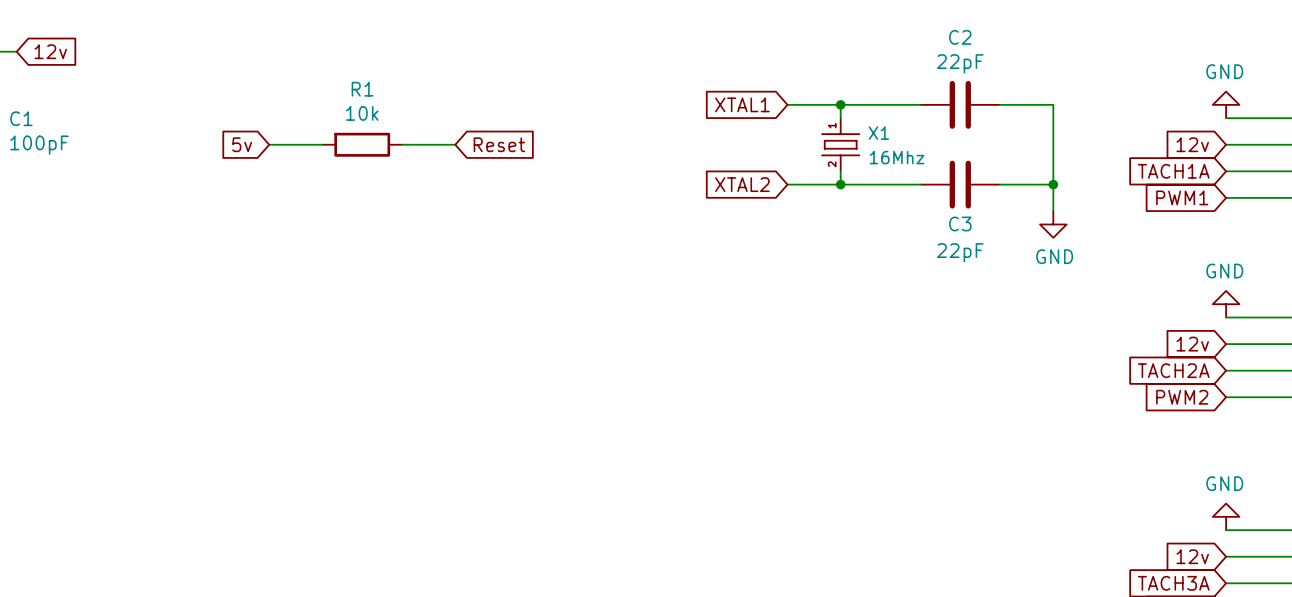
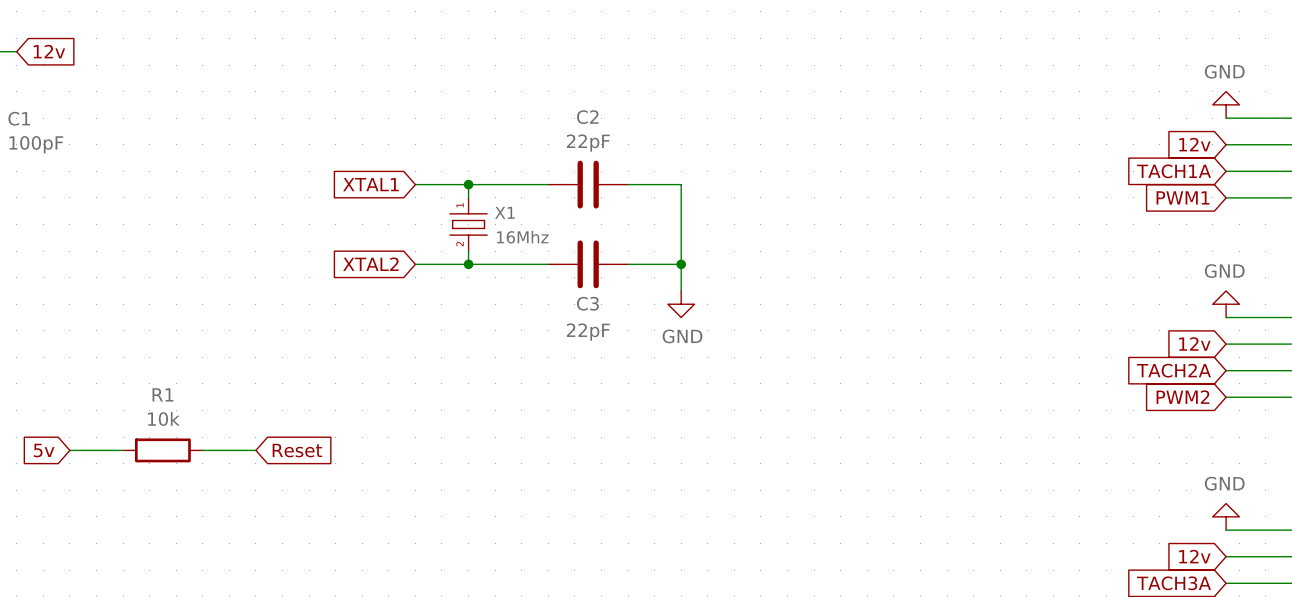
global label: XTAL1 (742, 104) -> none
wire: (787, 104) (920, 104) -> none
wire: (840, 104) (840, 118) -> none
junction: (840, 104) -> none
C2 position: (960, 104) -> (588, 184)
wire: (1000, 104) (1053, 104) (1053, 211) -> none
global label: 5v (242, 144) -> none
wire: (269, 144) (322, 144) -> none
R1 position: (362, 144) -> (162, 450)
wire: (402, 144) (455, 144) -> (628, 264) (681, 264)
global label: Reset (499, 144) -> none
X1 position: (840, 144) -> (468, 224)
wire: (840, 171) (840, 184) -> none
global label: none -> XTAL1 (370, 184)
wire: none -> (415, 184) (548, 184)
wire: none -> (468, 184) (468, 197)
junction: none -> (468, 184)
wire: none -> (628, 184) (681, 184) (681, 290)
global label: XTAL2 (742, 184) -> none
wire: (787, 184) (920, 184) -> none
junction: (840, 184) -> none
C3 position: (960, 184) -> (588, 264)
wire: (1000, 184) (1053, 184) -> none
junction: (1053, 184) -> none
power symbol: GND (1053, 224) -> none
wire: none -> (468, 251) (468, 264)
global label: none -> XTAL2 (370, 264)
wire: none -> (415, 264) (548, 264)
junction: none -> (468, 264)
junction: none -> (681, 264)
power symbol: none -> GND (681, 304)
global label: none -> 5v (44, 450)
wire: none -> (69, 450) (123, 450)
wire: none -> (202, 450) (255, 450)
global label: none -> Reset (297, 450)

